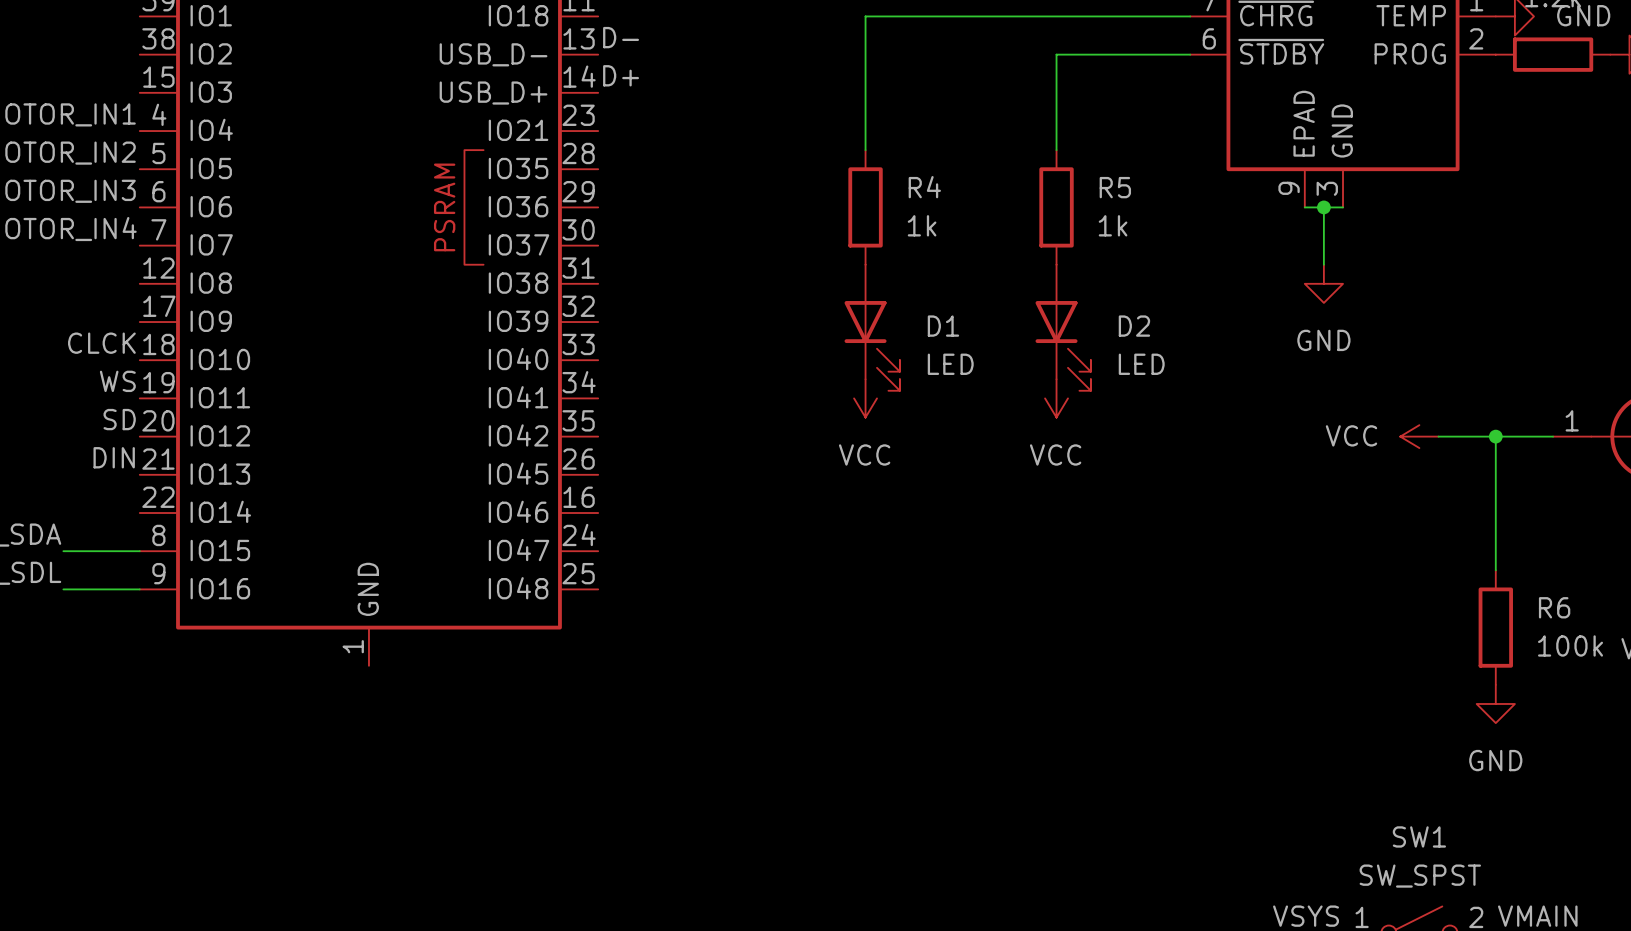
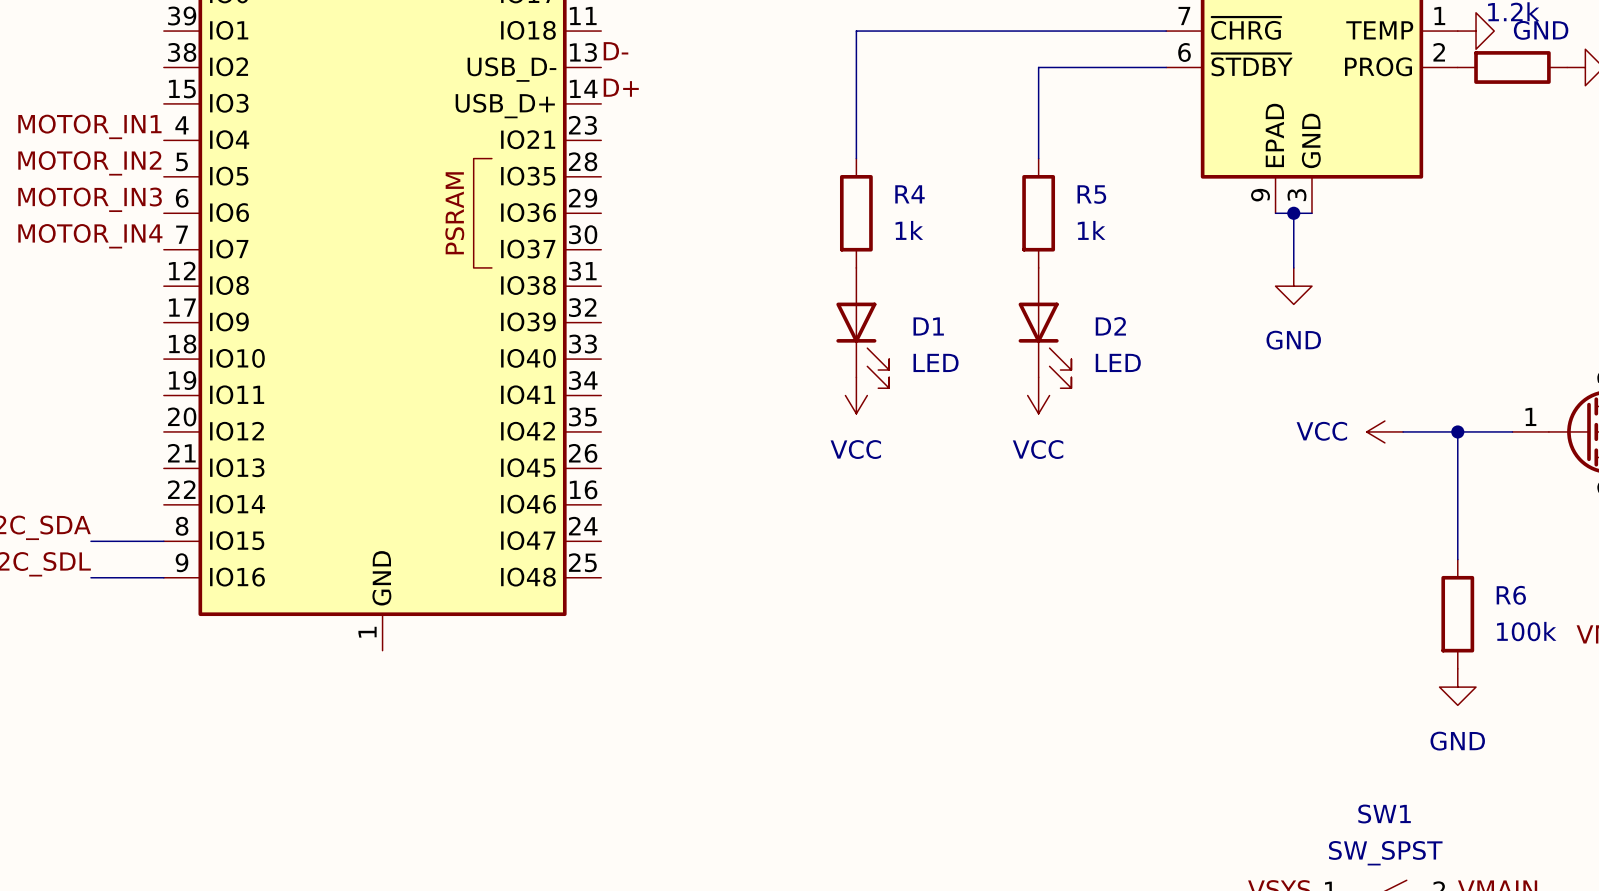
label: CLCK (101, 343) -> none
label: WS (117, 381) -> none
label: SD (119, 419) -> none
label: DIN (114, 457) -> none

